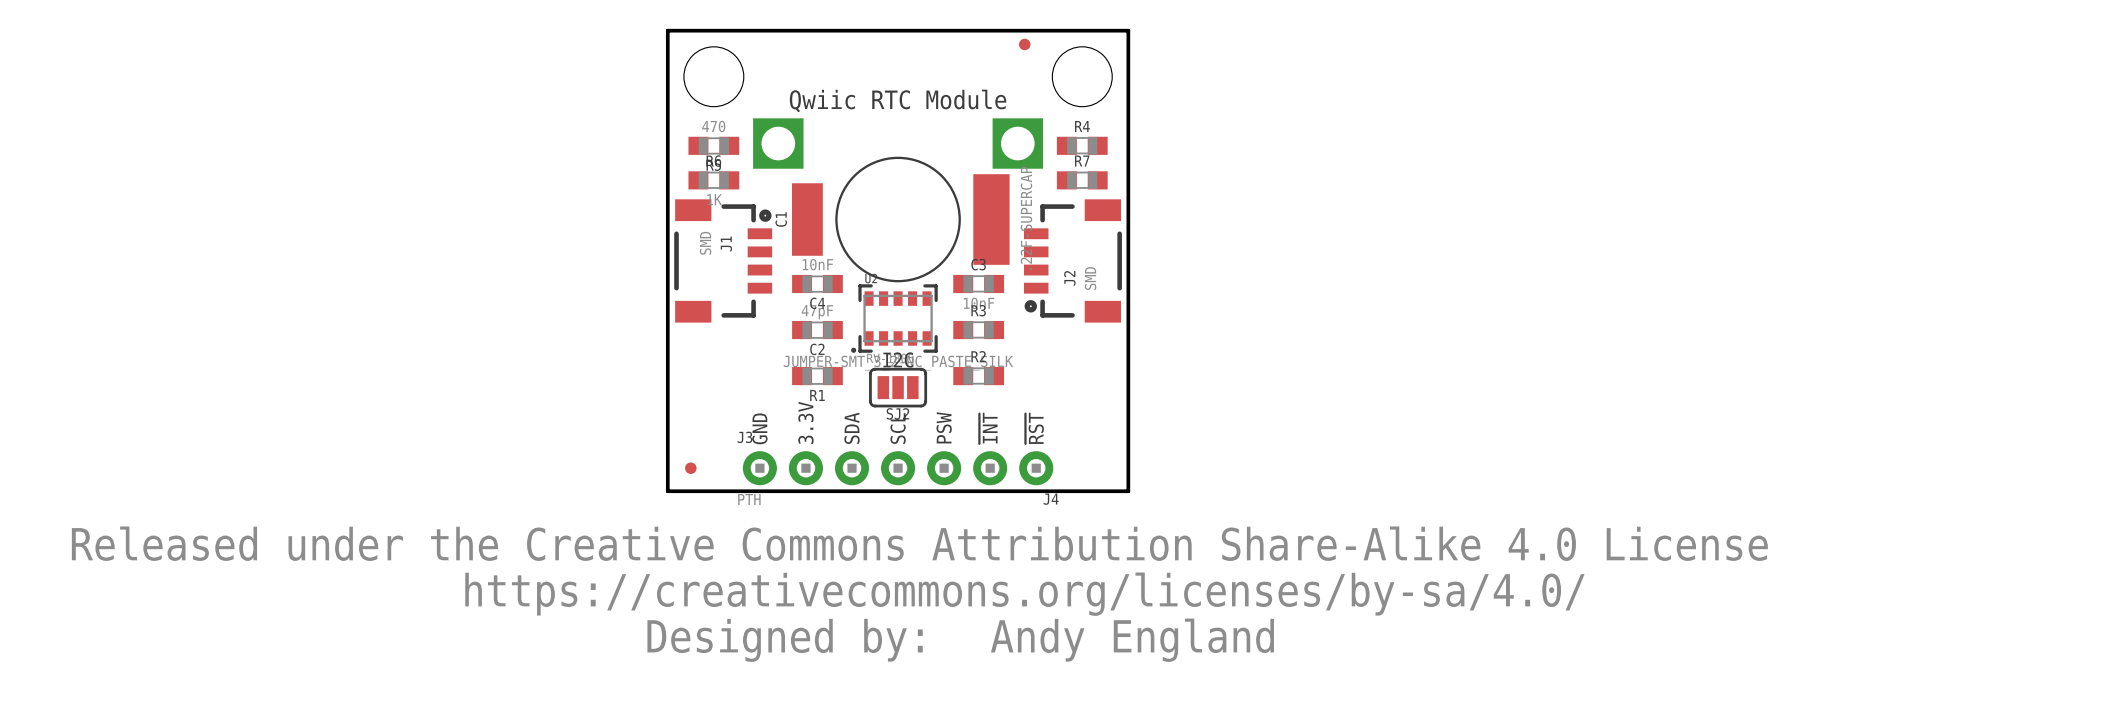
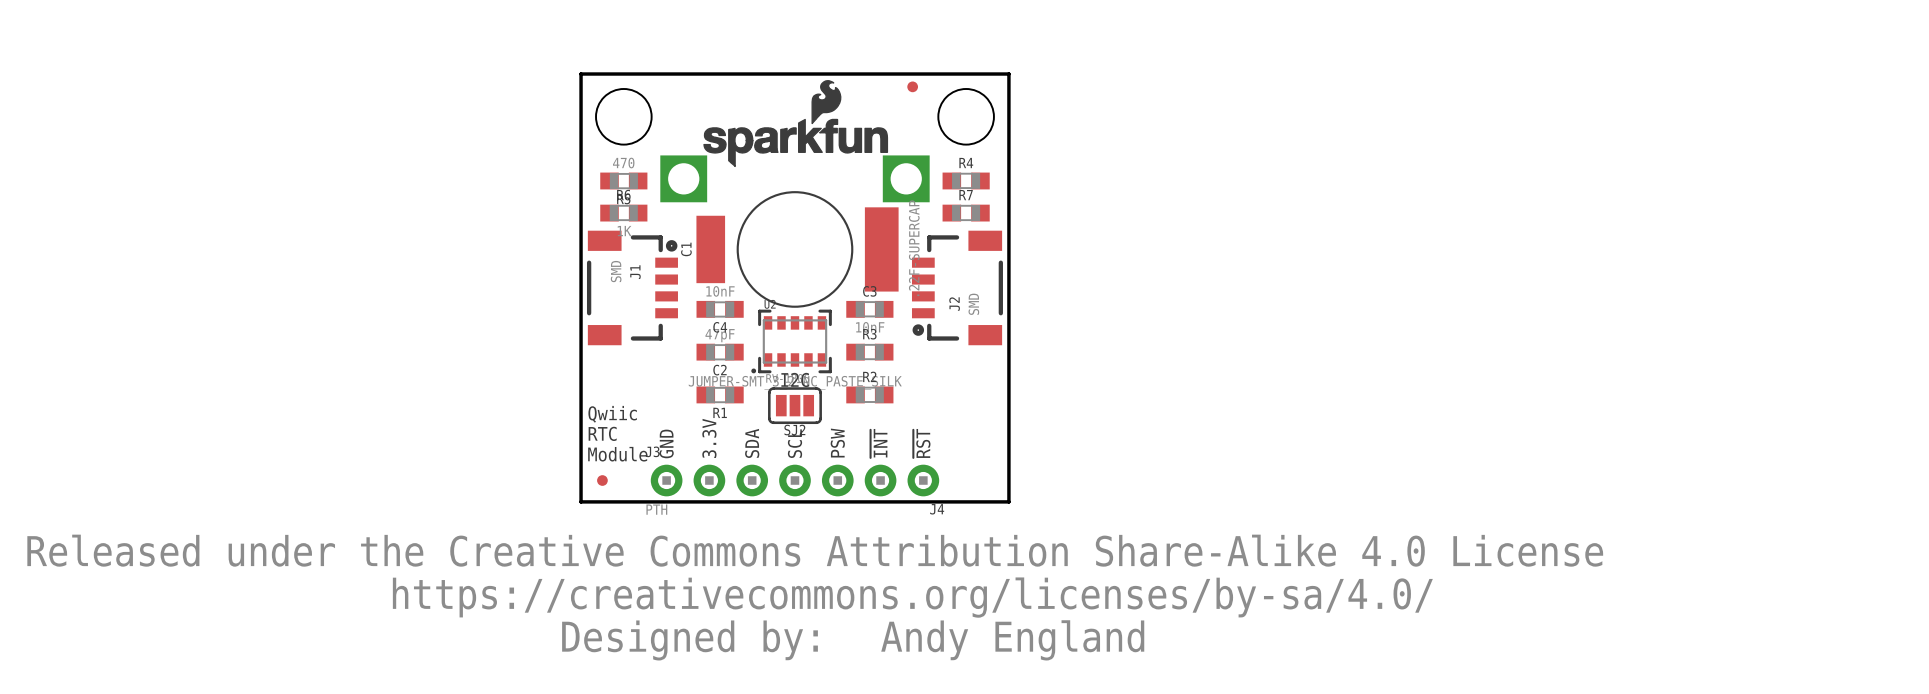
drawing: none -> [703, 80, 889, 168]
text: Qwiic RTC Module (898, 100) -> none
text: none -> Qwiic (612, 414)
text: none -> RTC (602, 433)
text: none -> Module (617, 454)

